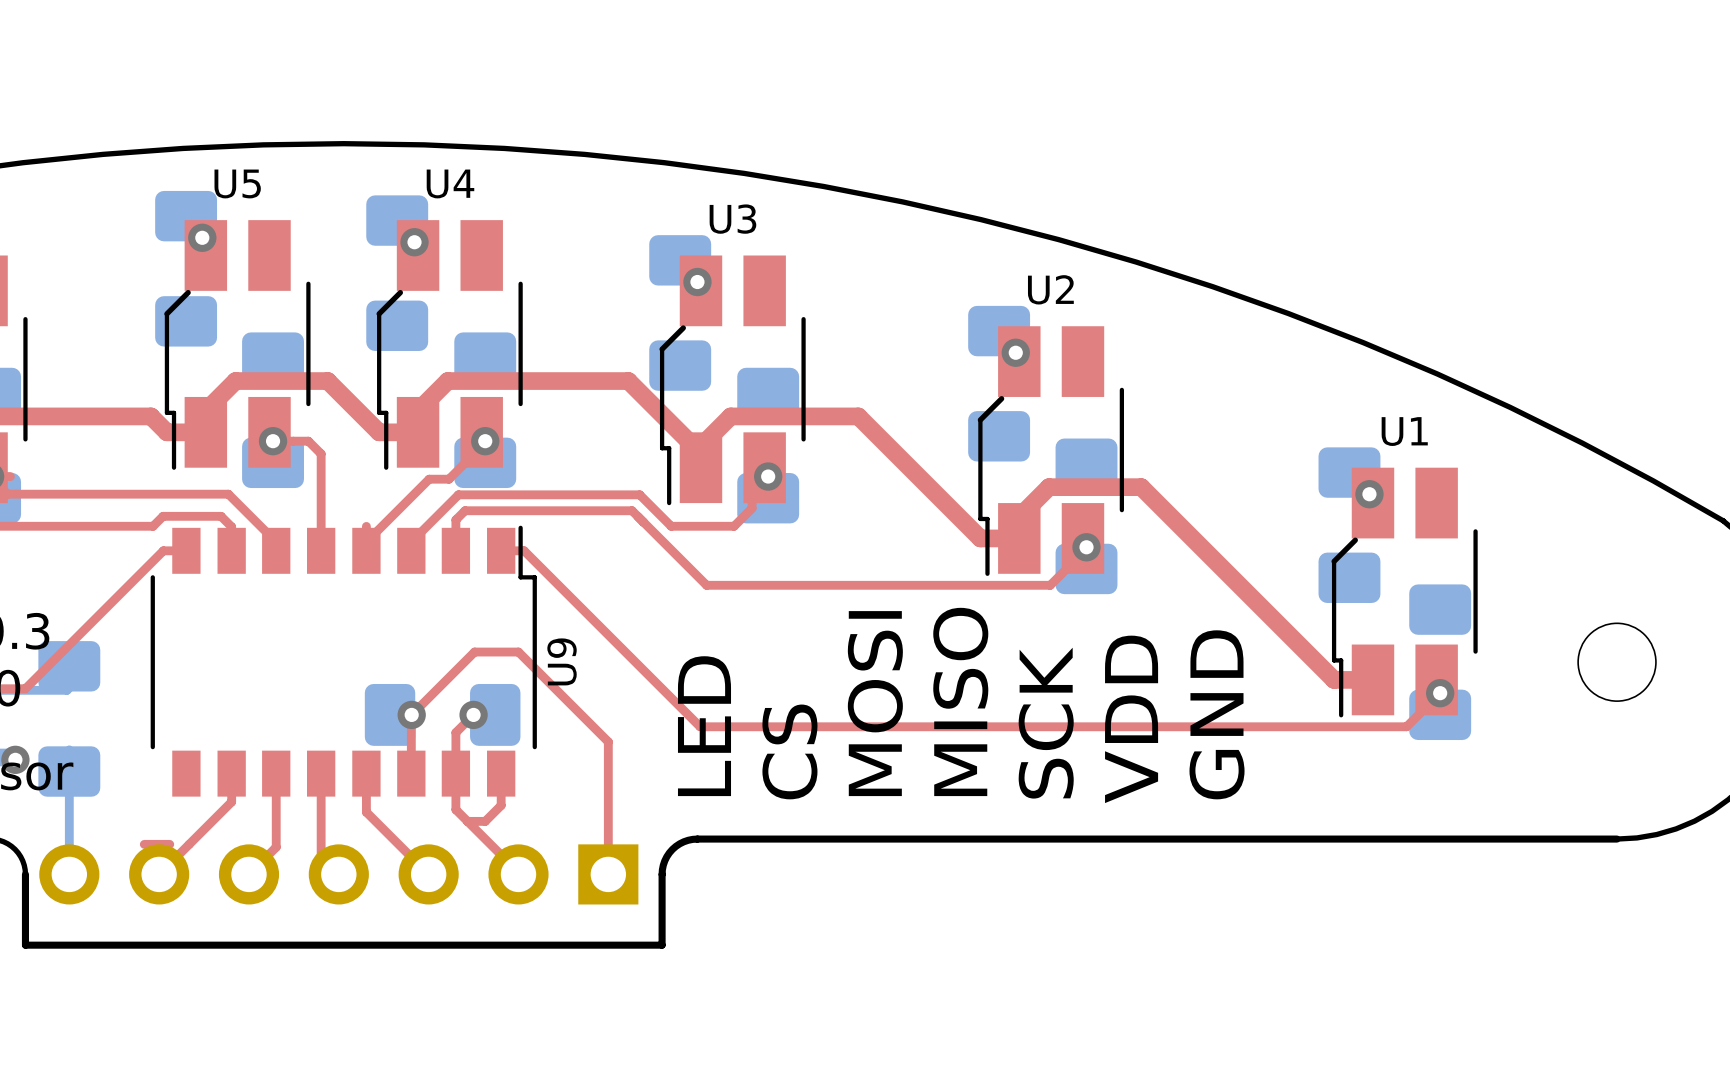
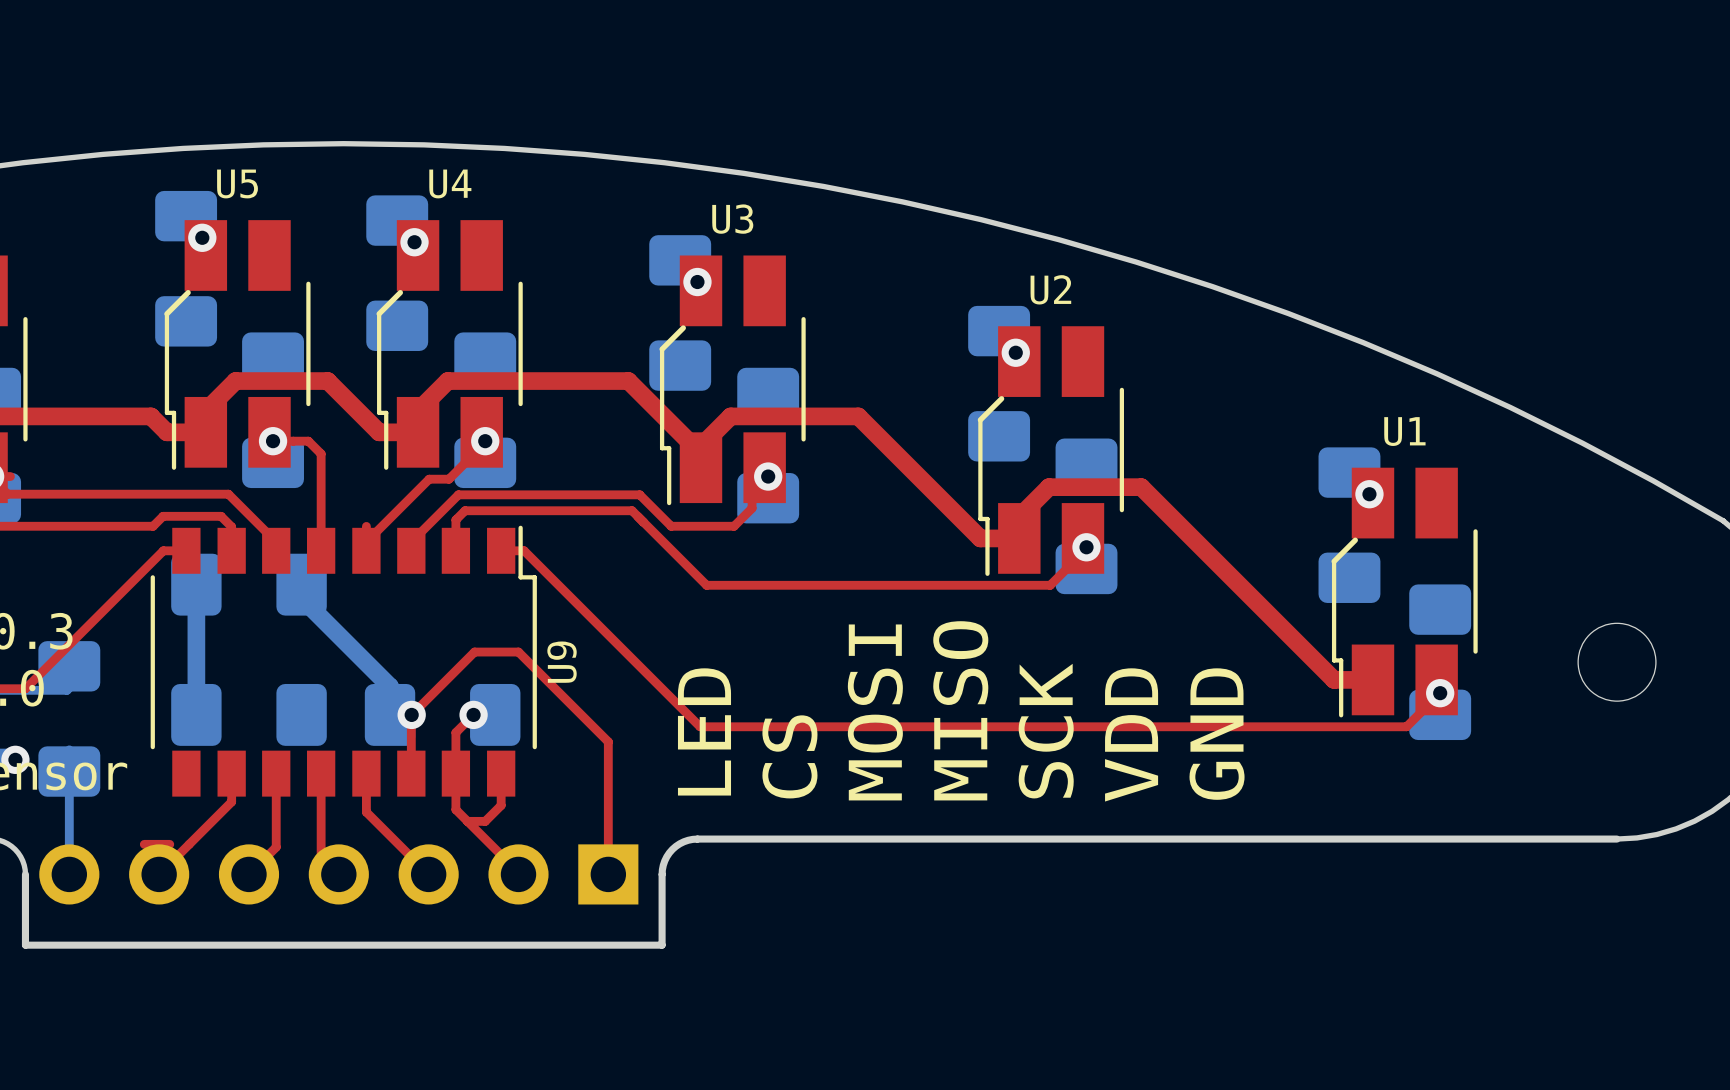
part: none -> (248, 584)
bottom track: none -> (196, 598) (196, 714)
bottom track: none -> (301, 598) (390, 686) (390, 714)
part: none -> (248, 714)

